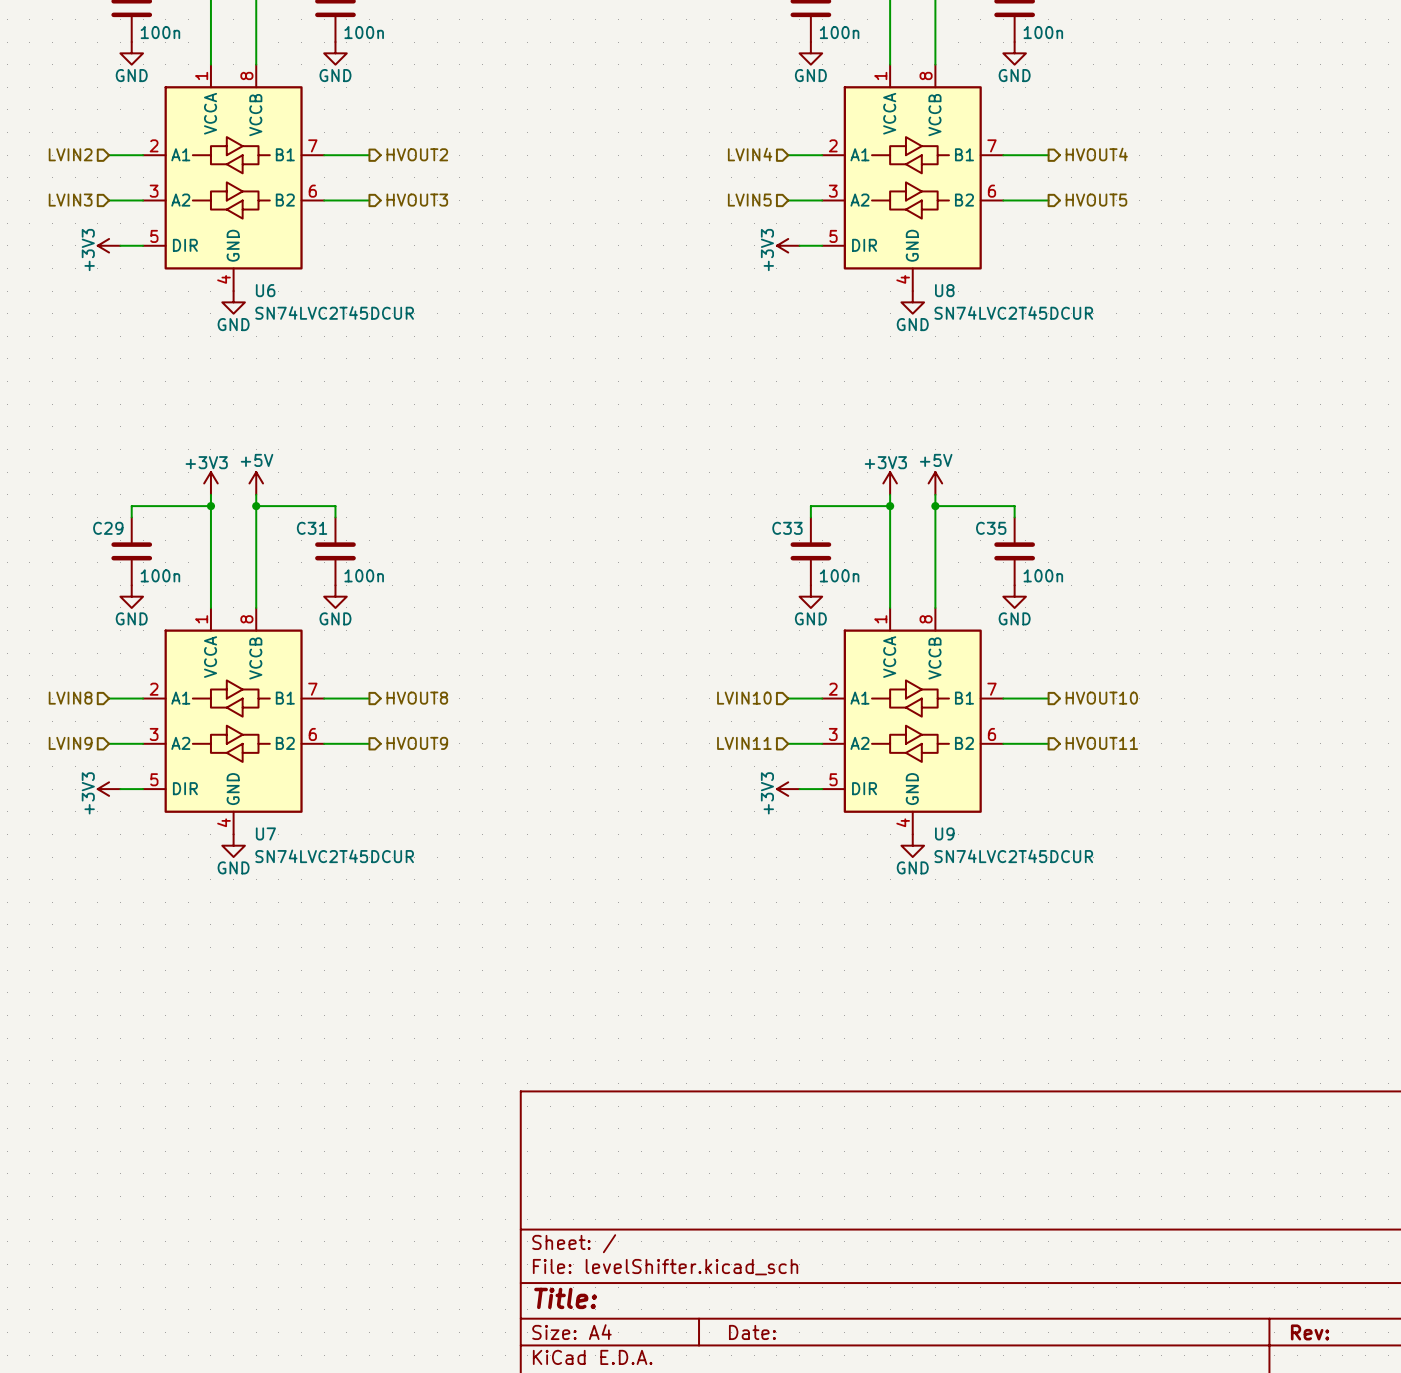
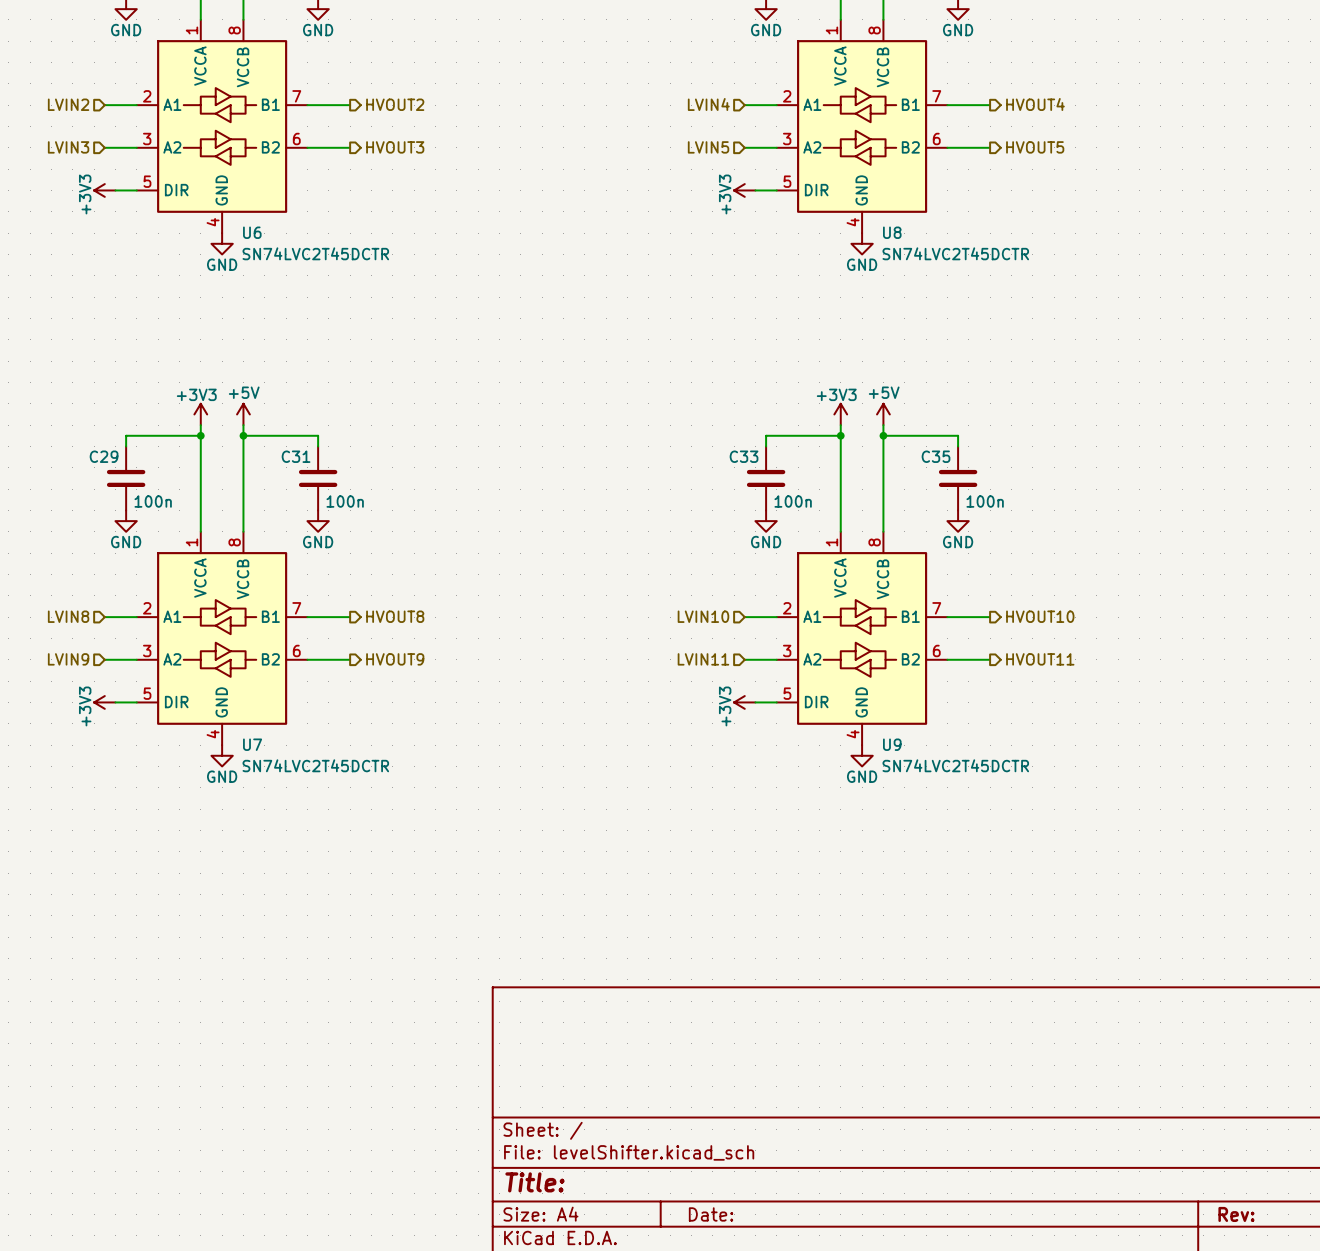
U6 value: SN74LVC2T45DCUR (334, 312) -> SN74LVC2T45DCTR (315, 253)
U8 value: SN74LVC2T45DCUR (1013, 312) -> SN74LVC2T45DCTR (955, 253)
U7 value: SN74LVC2T45DCUR (334, 856) -> SN74LVC2T45DCTR (315, 765)
U9 value: SN74LVC2T45DCUR (1013, 856) -> SN74LVC2T45DCTR (955, 765)

